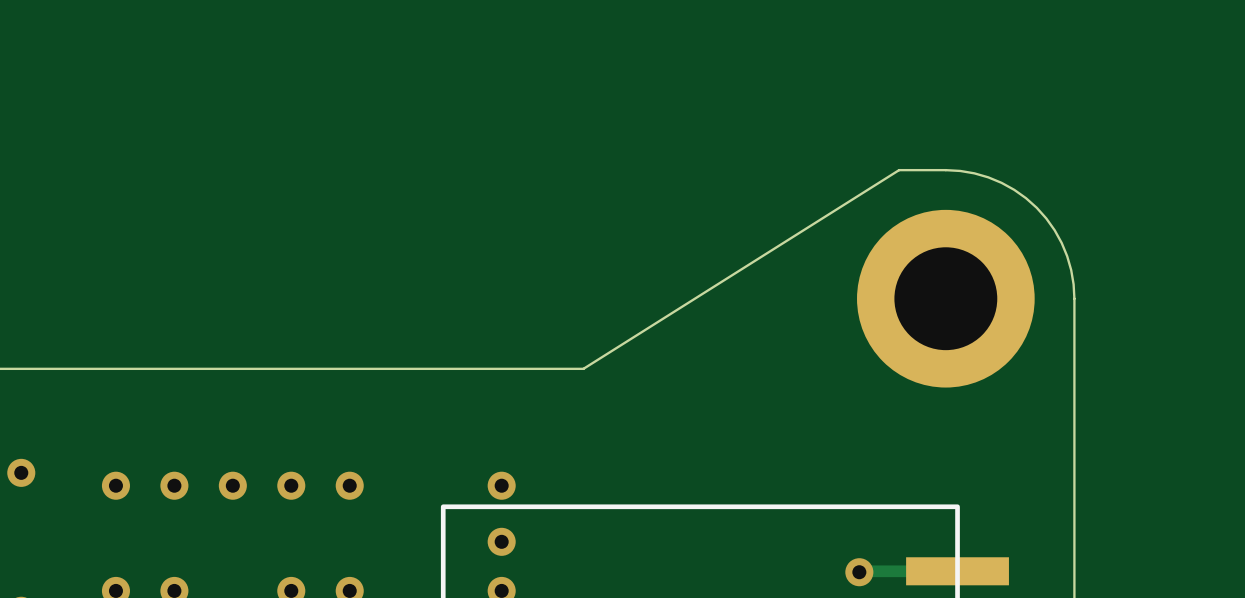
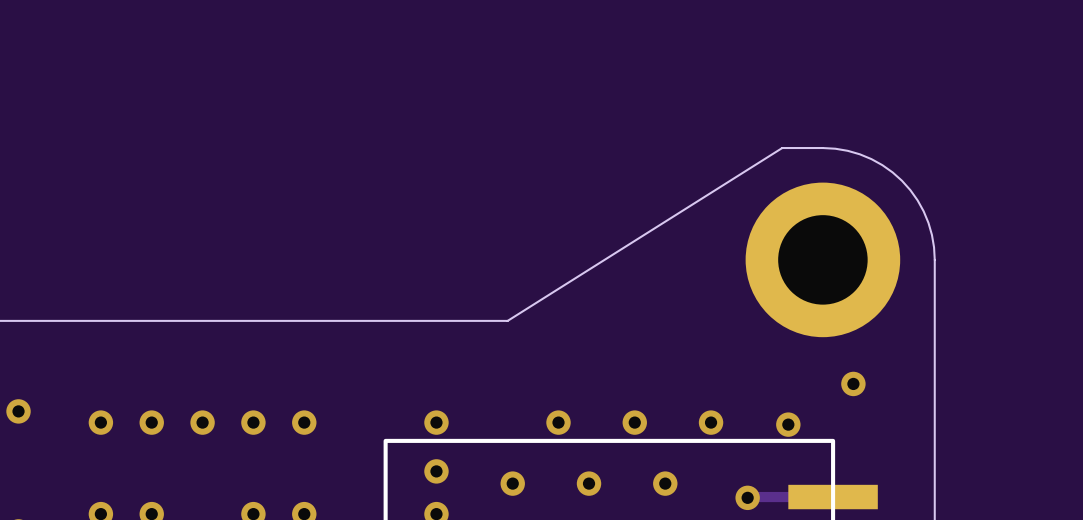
via: none -> (853, 383)
via: none -> (558, 422)
via: none -> (634, 422)
via: none -> (711, 422)
via: none -> (788, 424)
via: none -> (512, 483)
via: none -> (589, 483)
via: none -> (665, 483)

